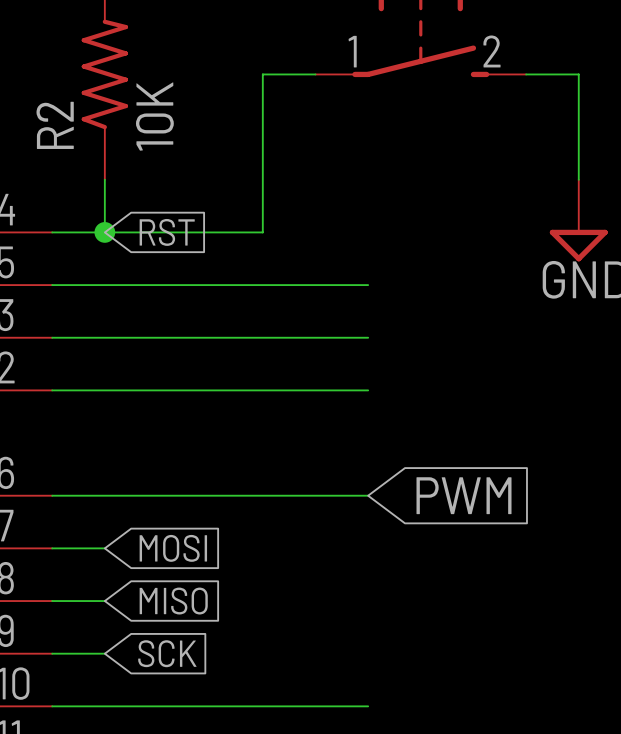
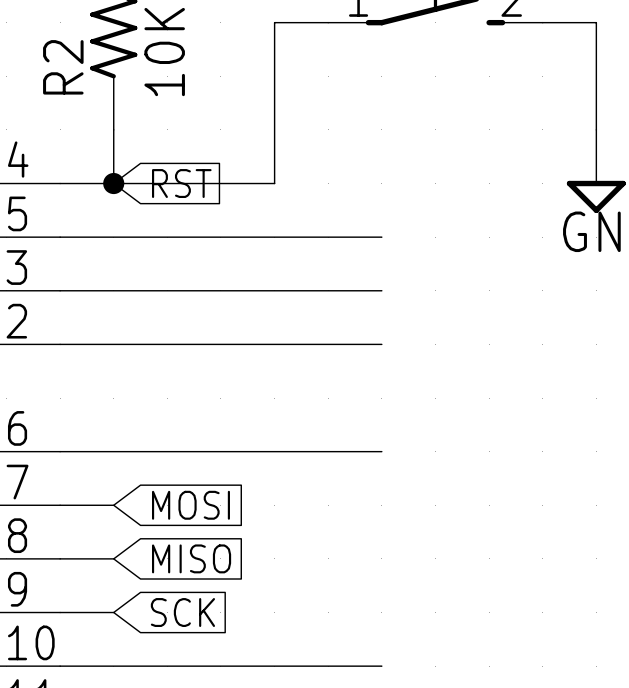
global label: PWM (464, 495) -> none

